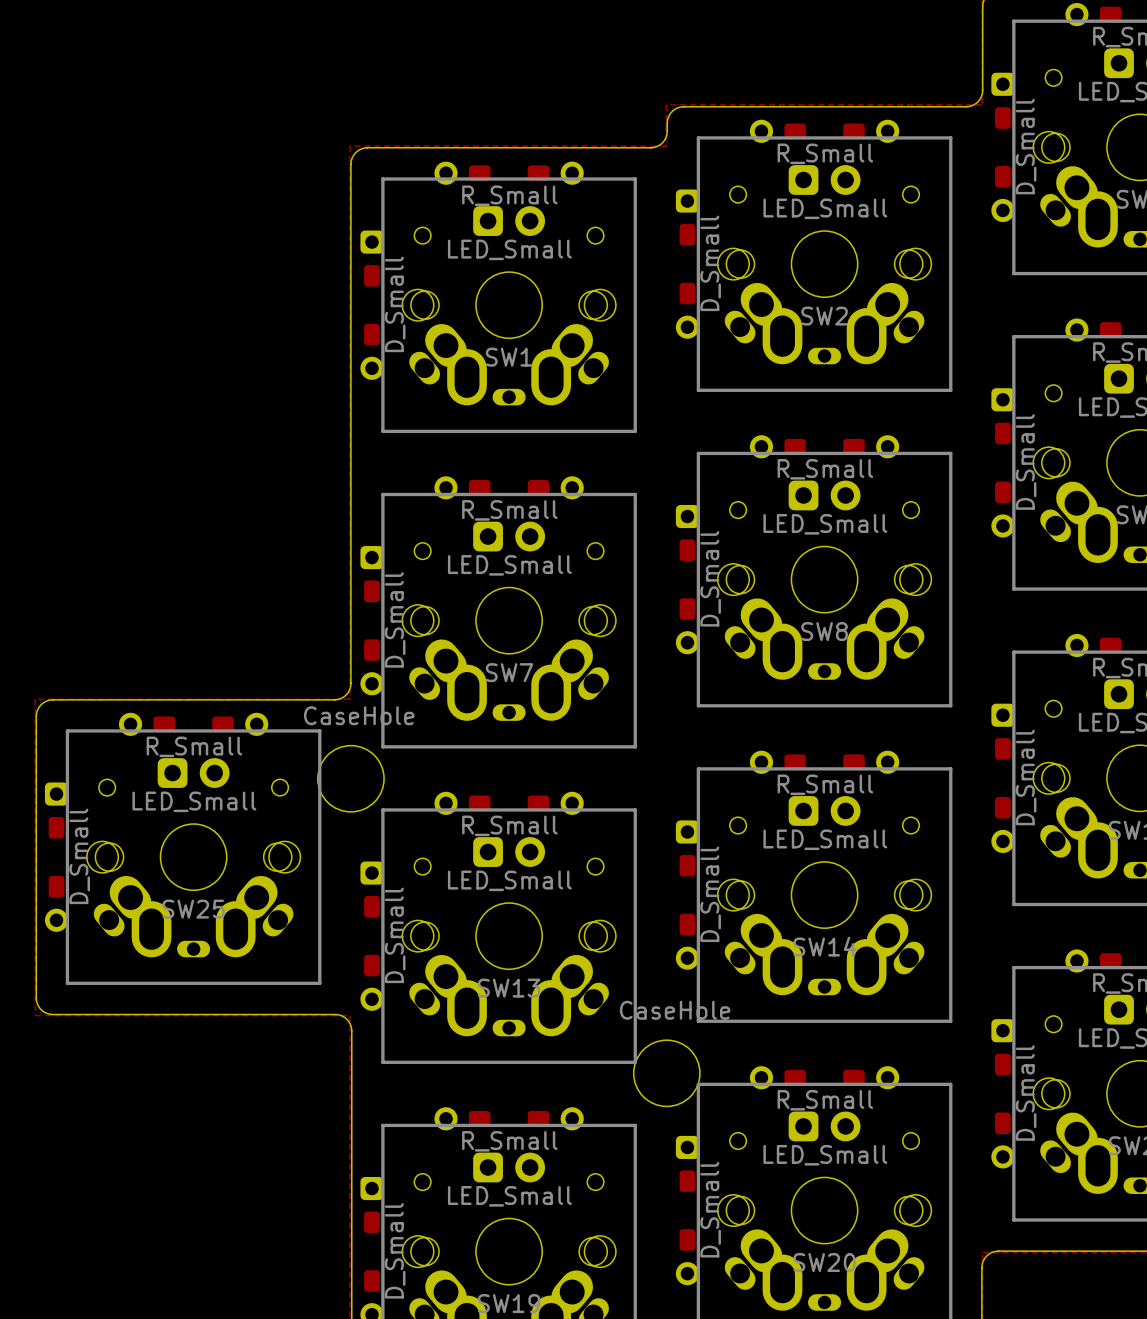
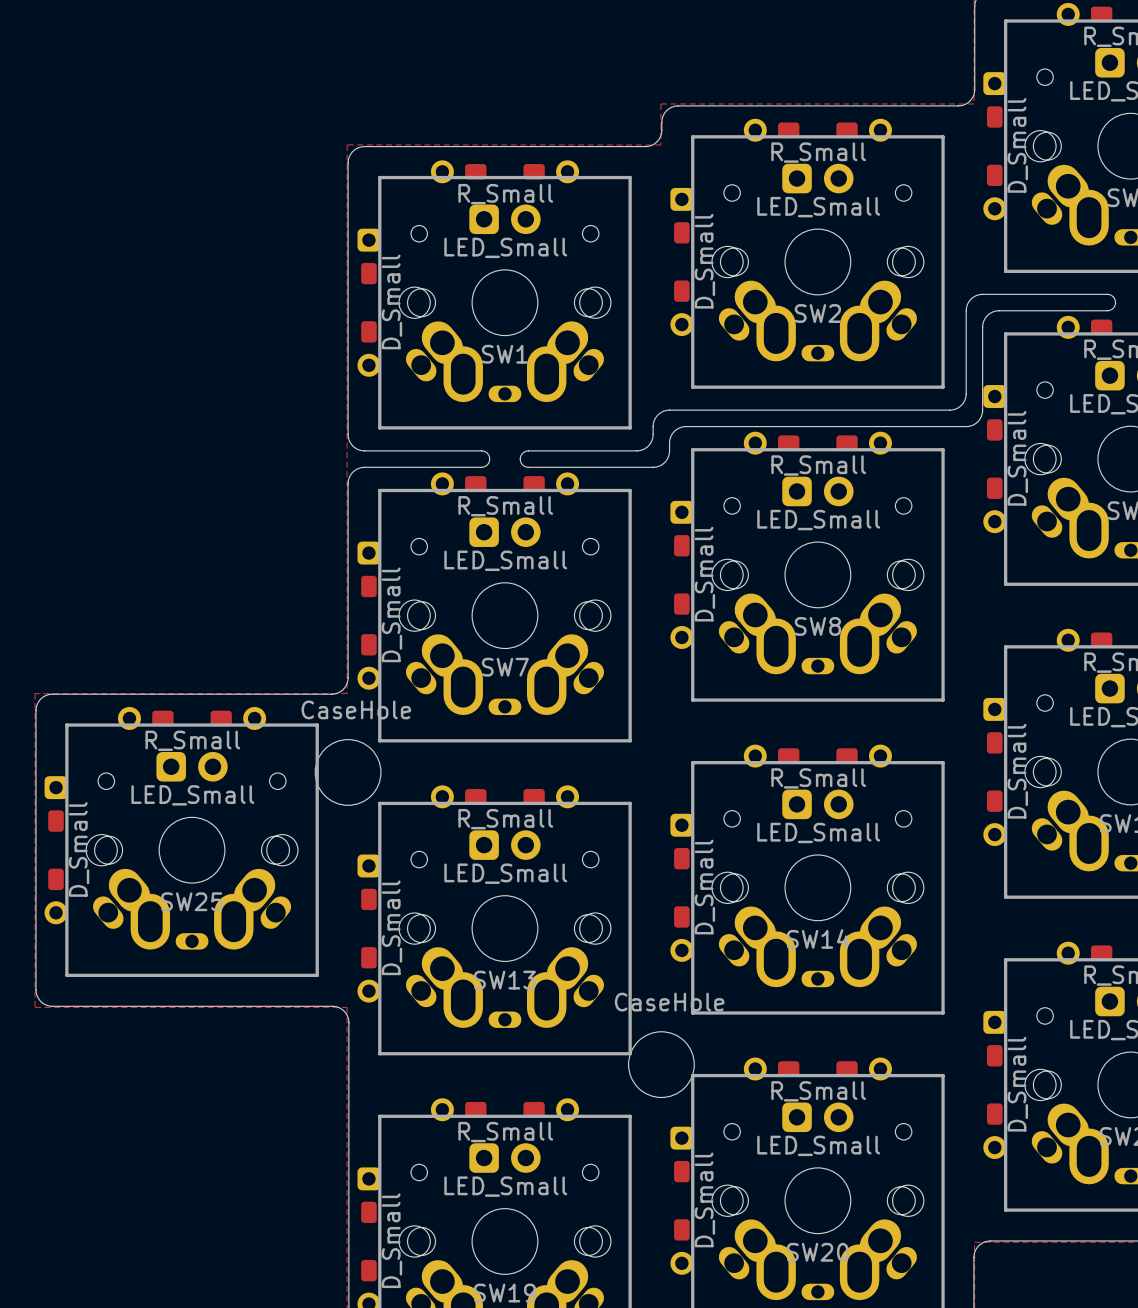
board edge: none -> (982, 294) (1108, 294) (1113, 297) (1115, 303) (1113, 308) (1108, 310) (999, 310) (989, 314) (982, 325) (982, 412) (979, 420) (970, 426) (683, 426) (677, 428) (671, 434) (668, 457) (664, 462) (657, 466) (528, 467) (520, 462) (521, 454) (527, 450) (642, 449) (651, 440) (655, 418) (661, 412) (667, 410) (956, 408) (962, 403) (966, 395) (966, 306) (972, 297) (982, 294)
board edge: (350, 438) (350, 487) -> (348, 434) (352, 446) (362, 450) (482, 450) (487, 453) (489, 459) (487, 464) (482, 467) (362, 467) (352, 472) (348, 483)

